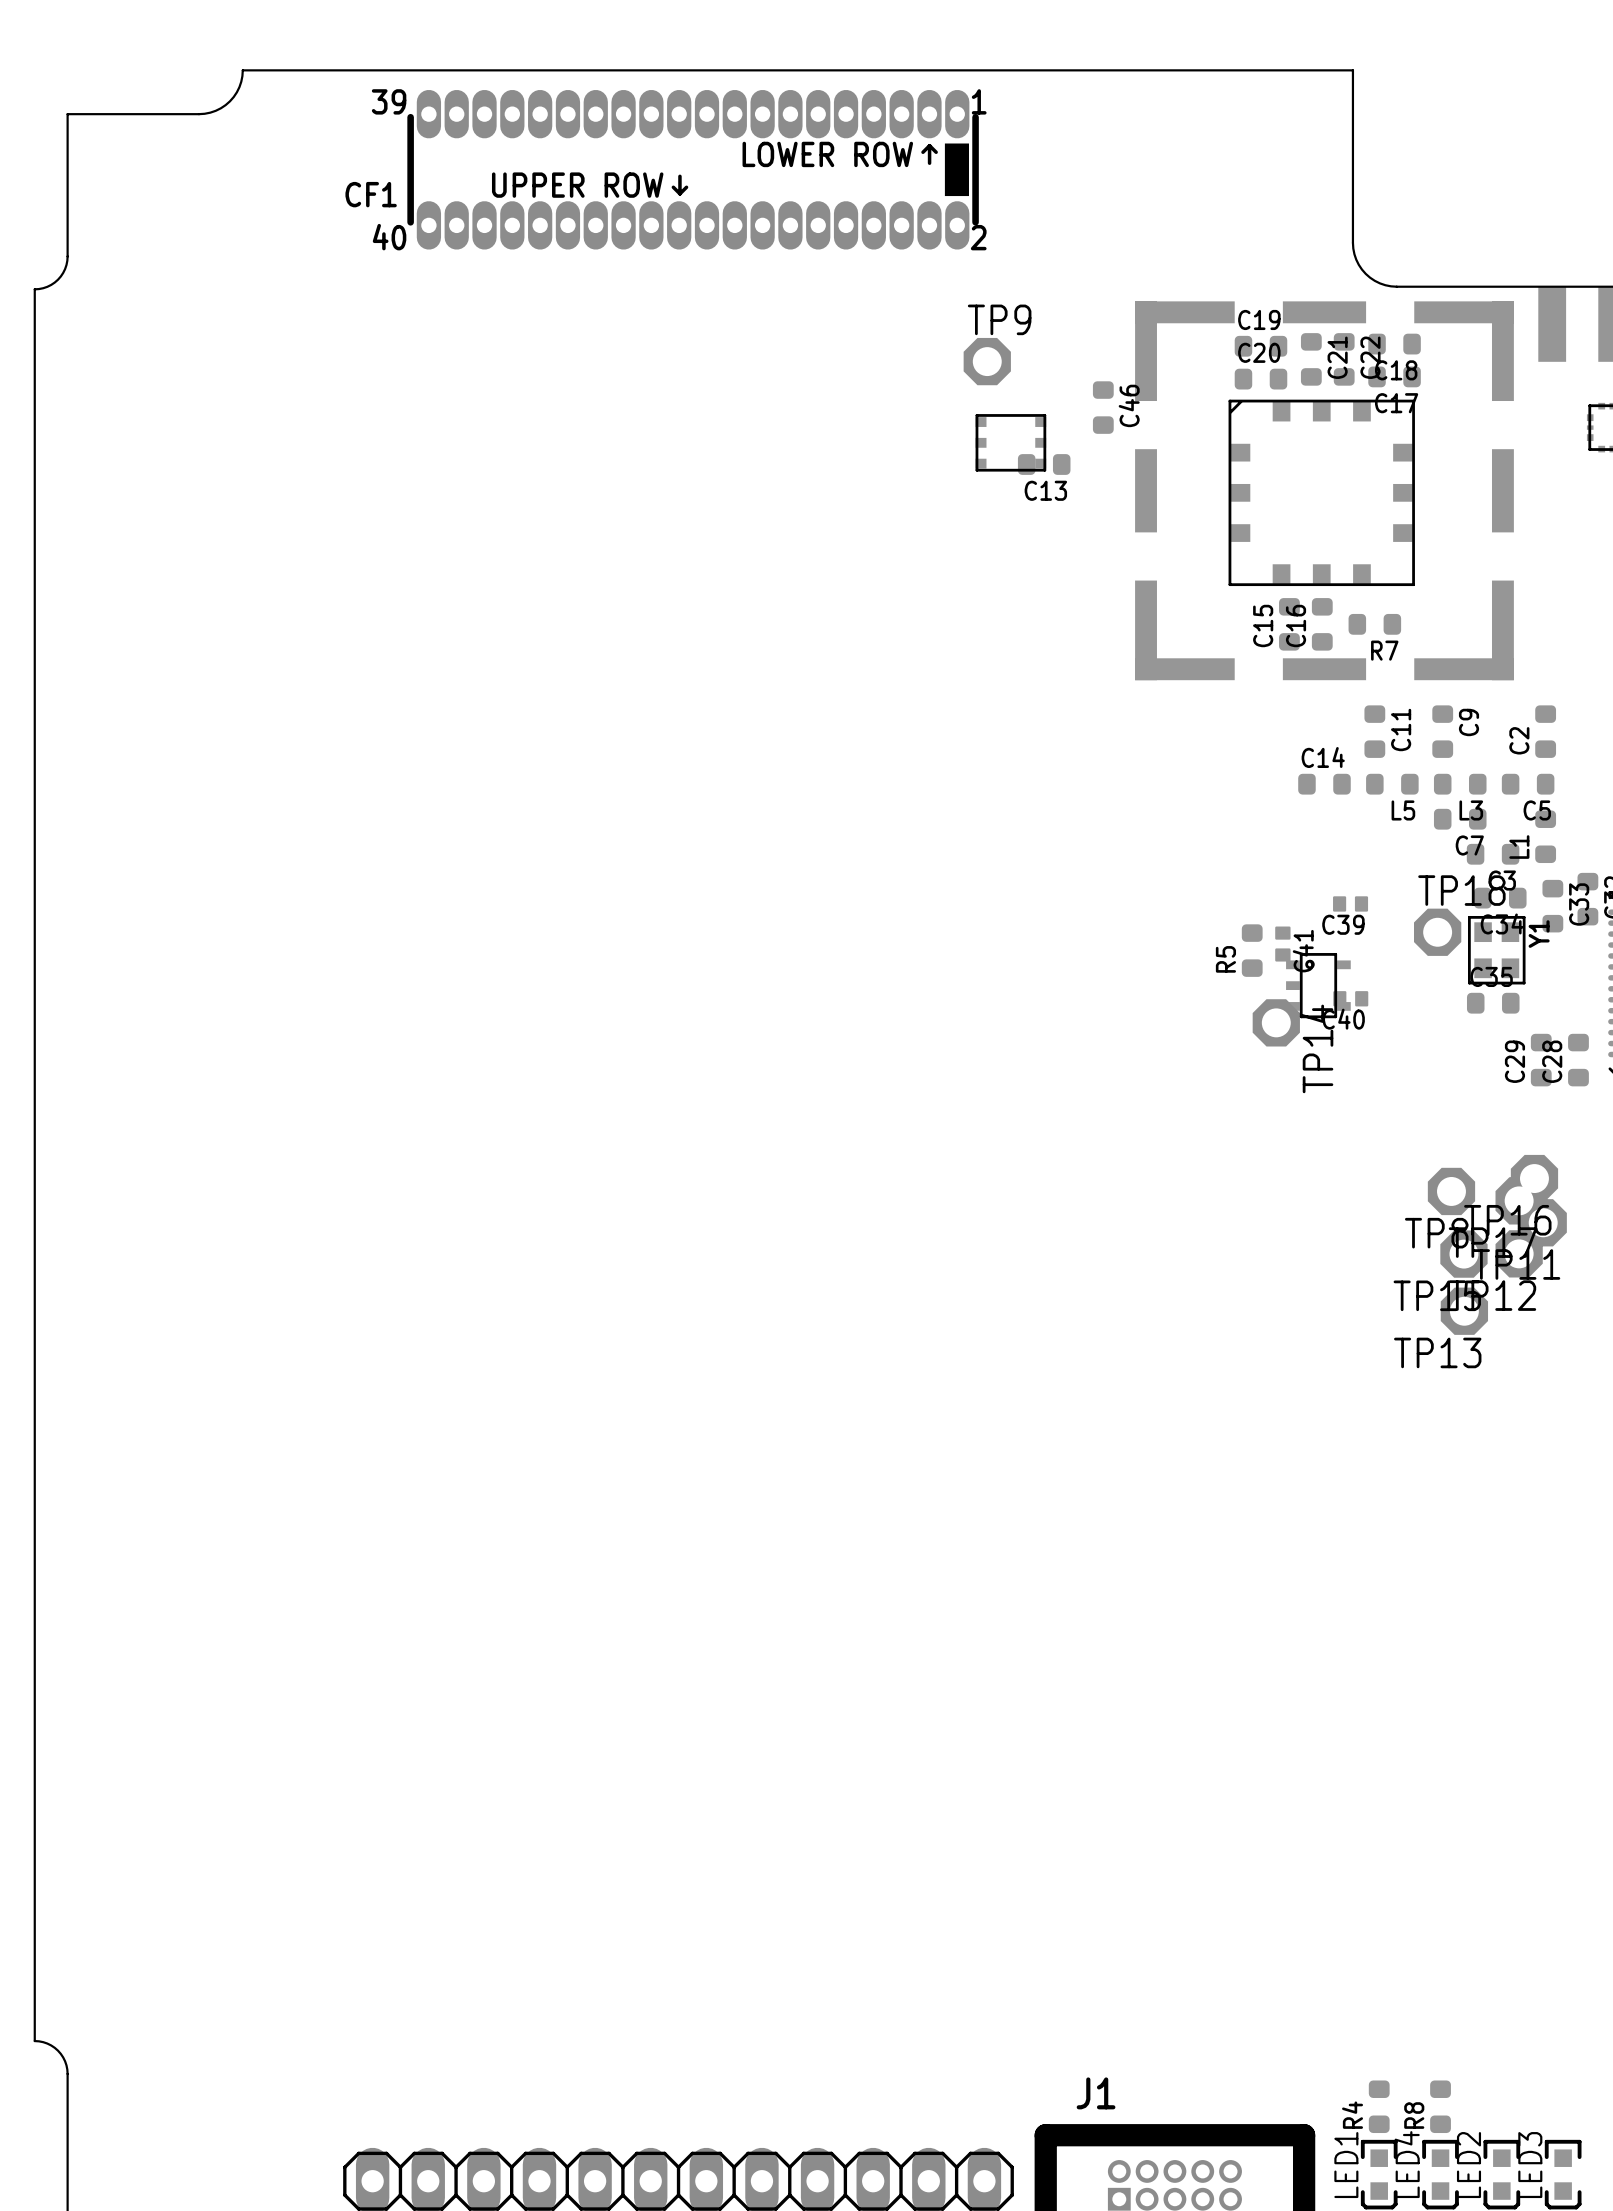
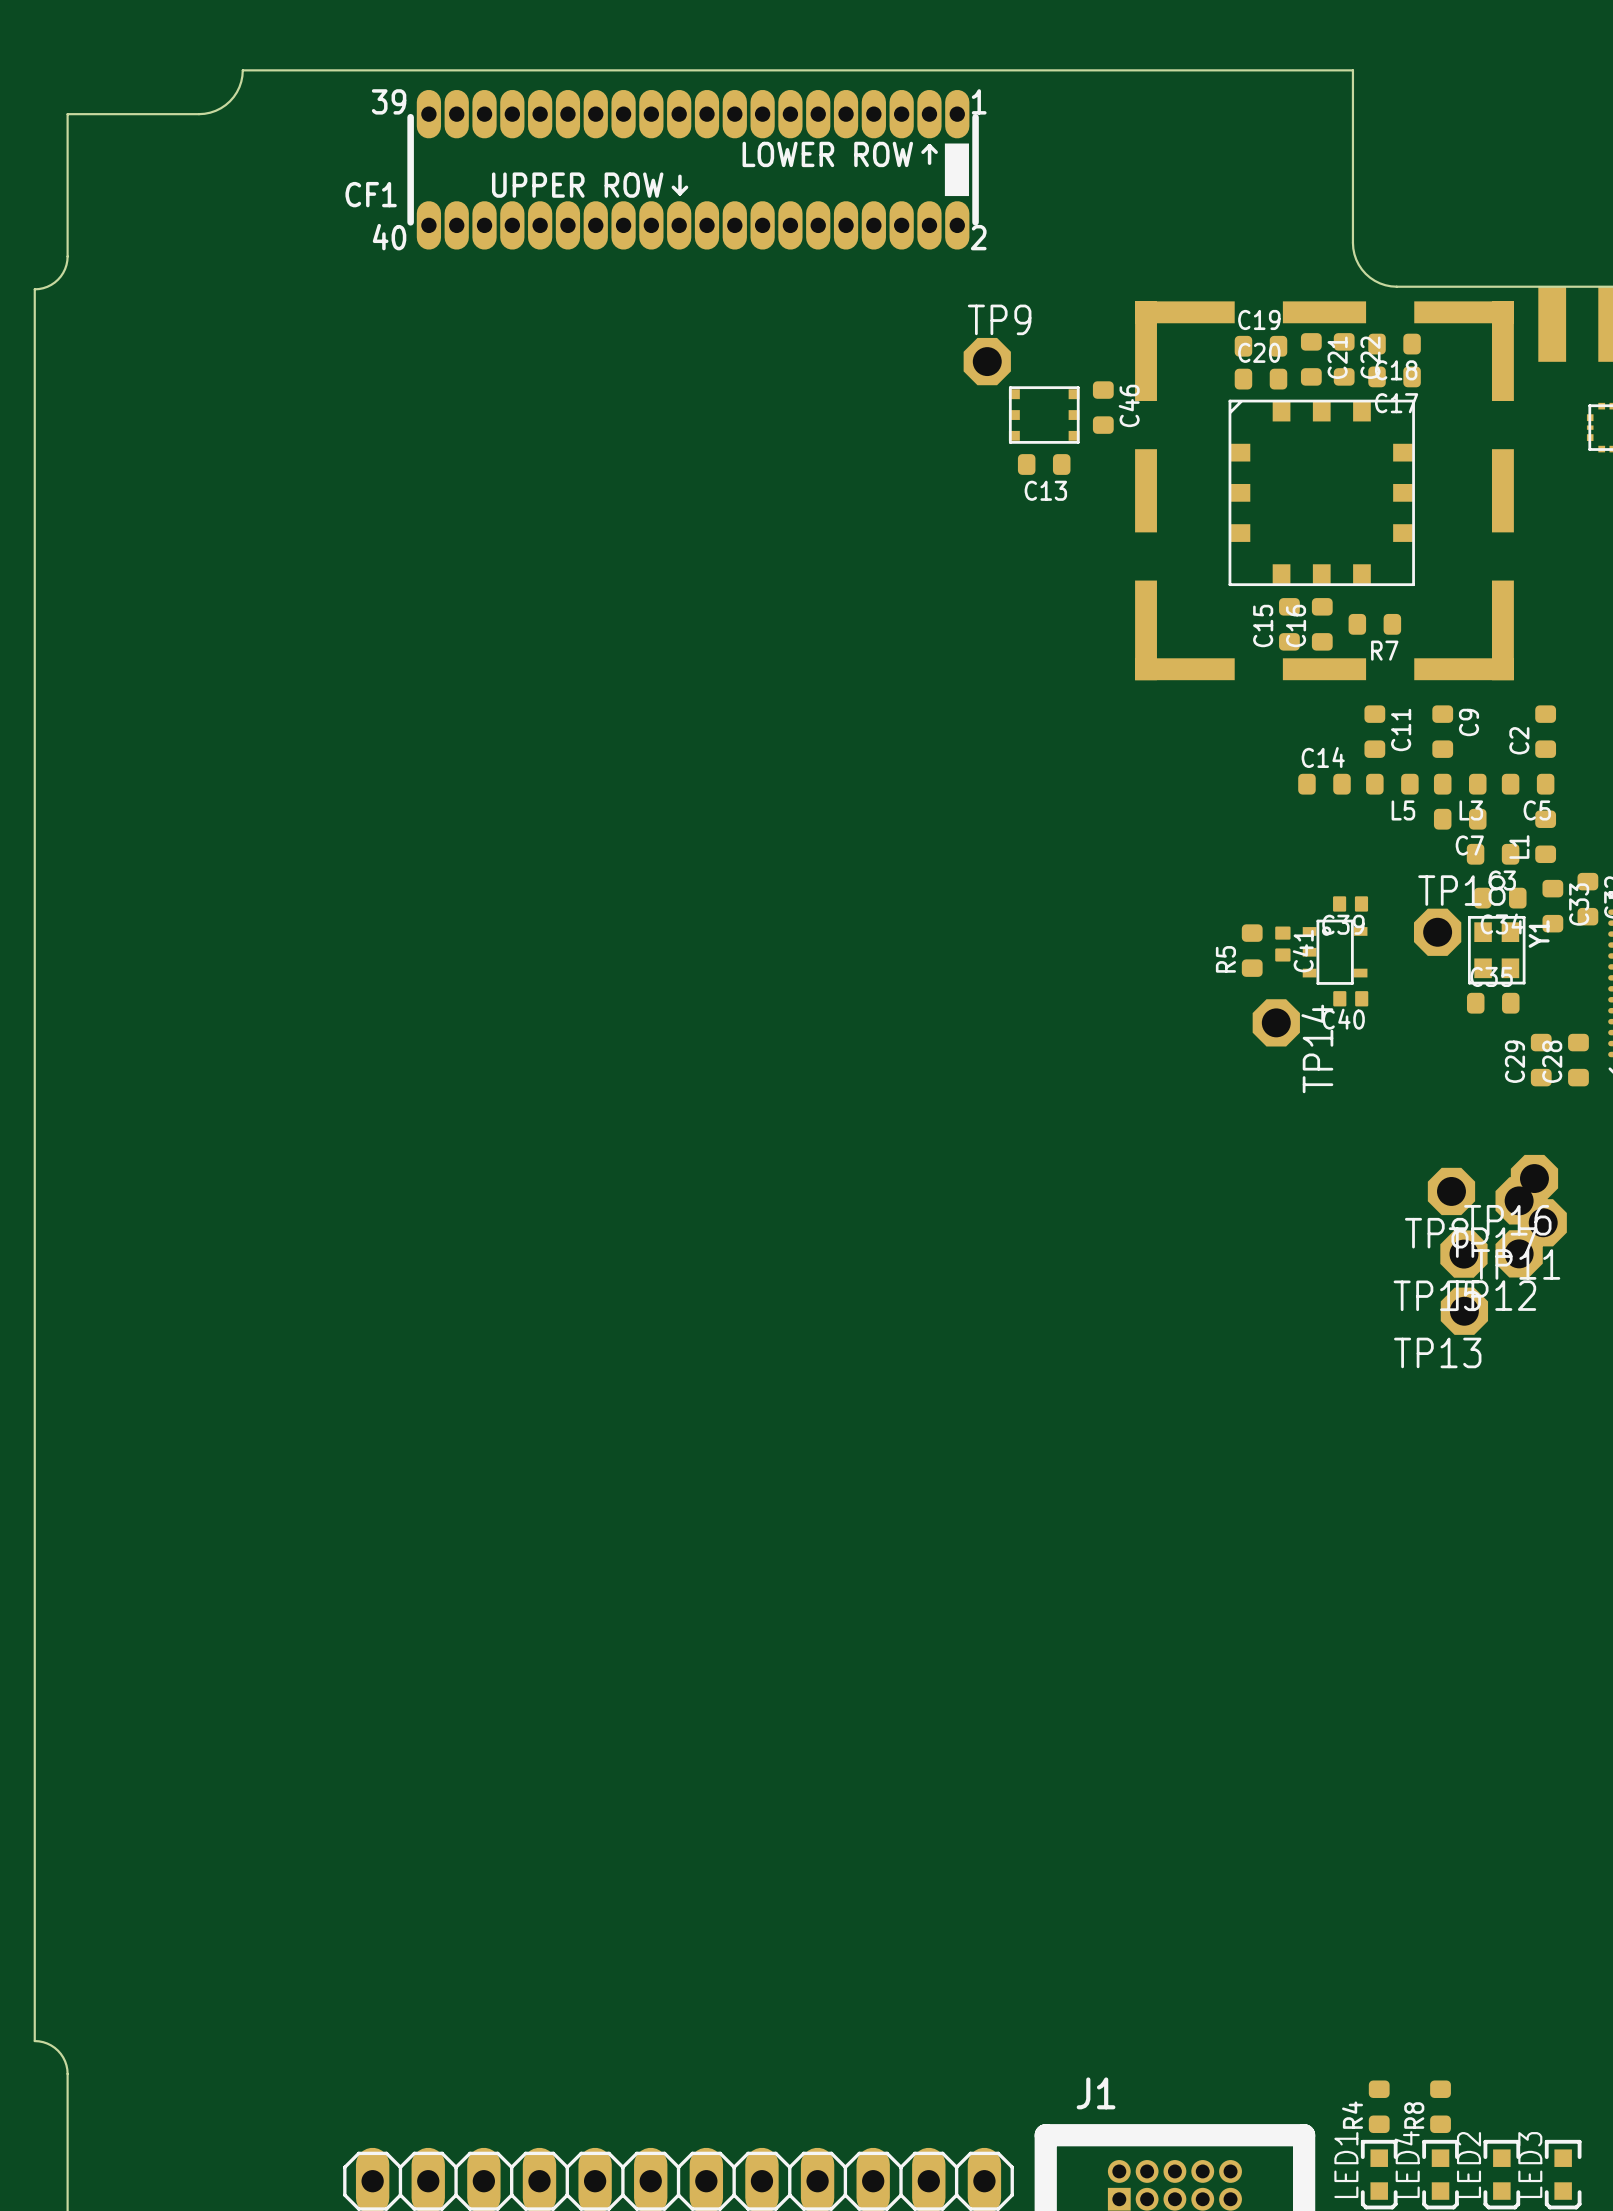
part position: (1010, 442) -> (1044, 415)
part position: (1318, 985) -> (1335, 952)

